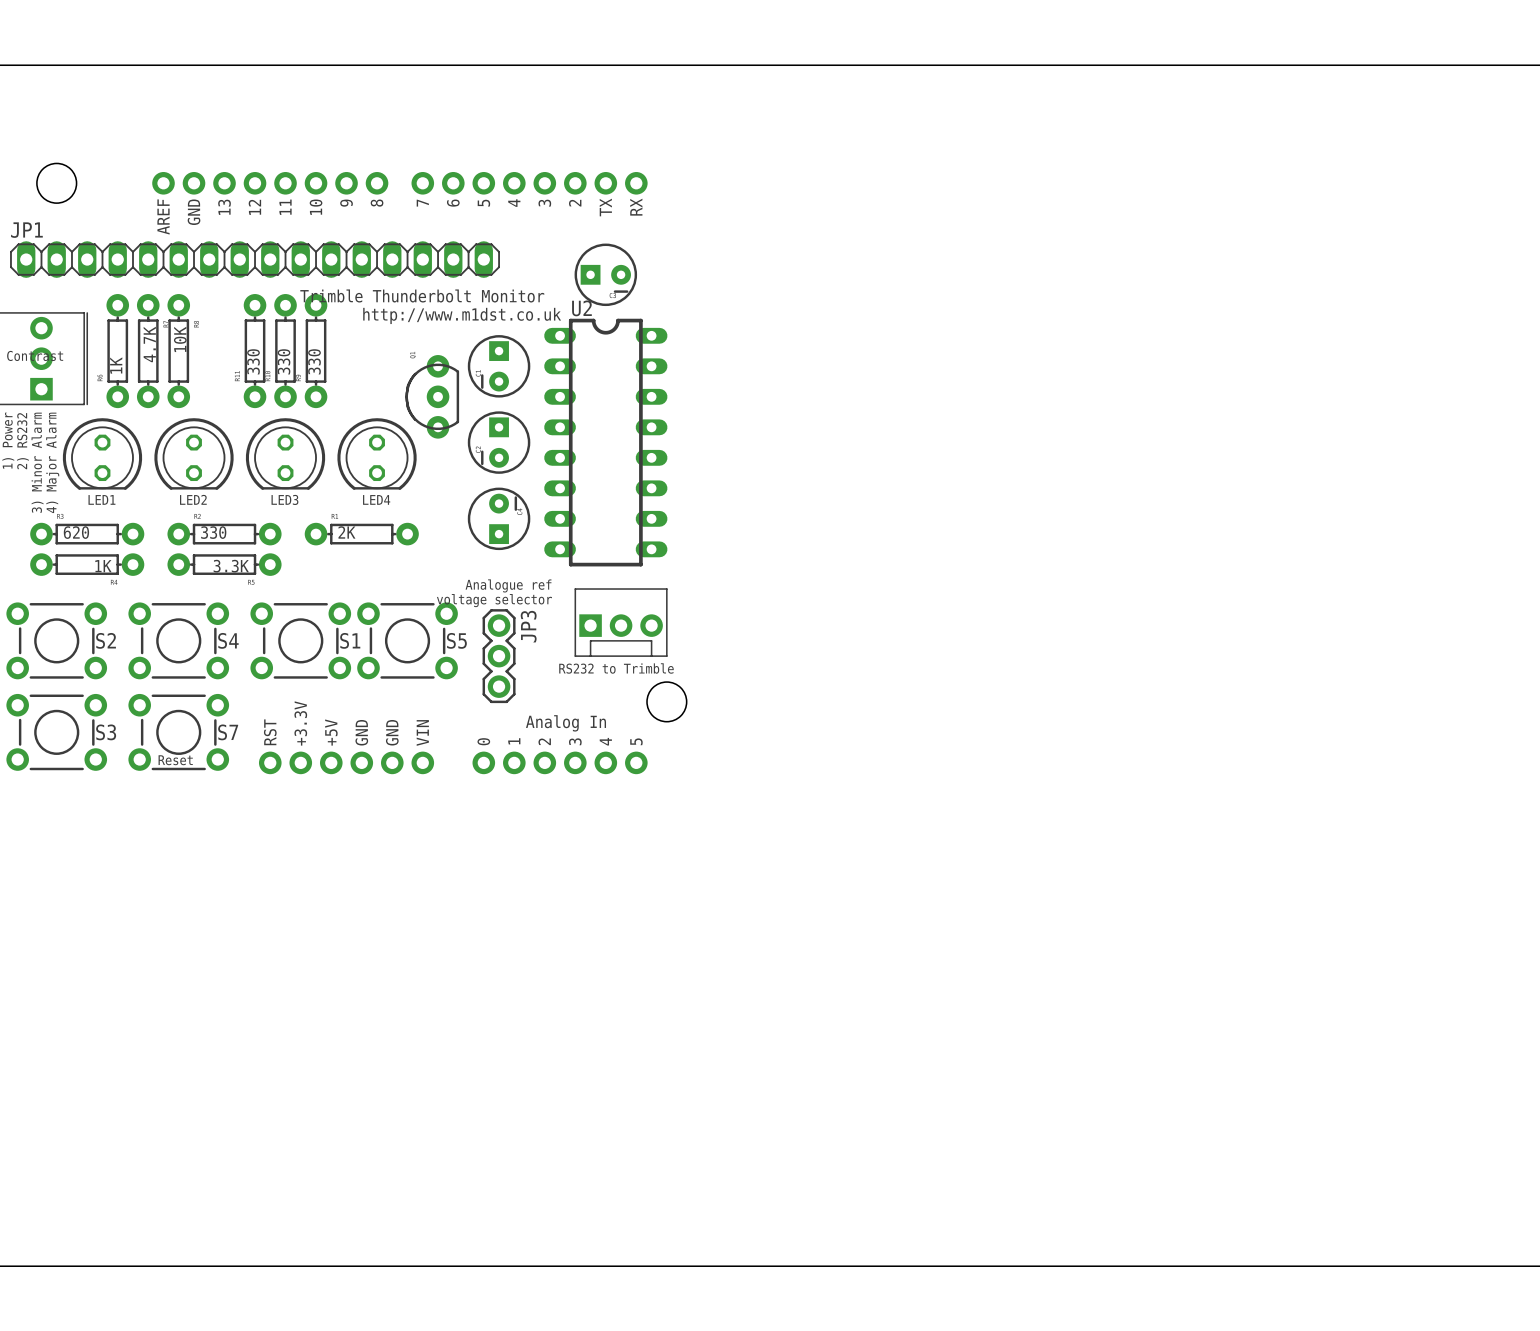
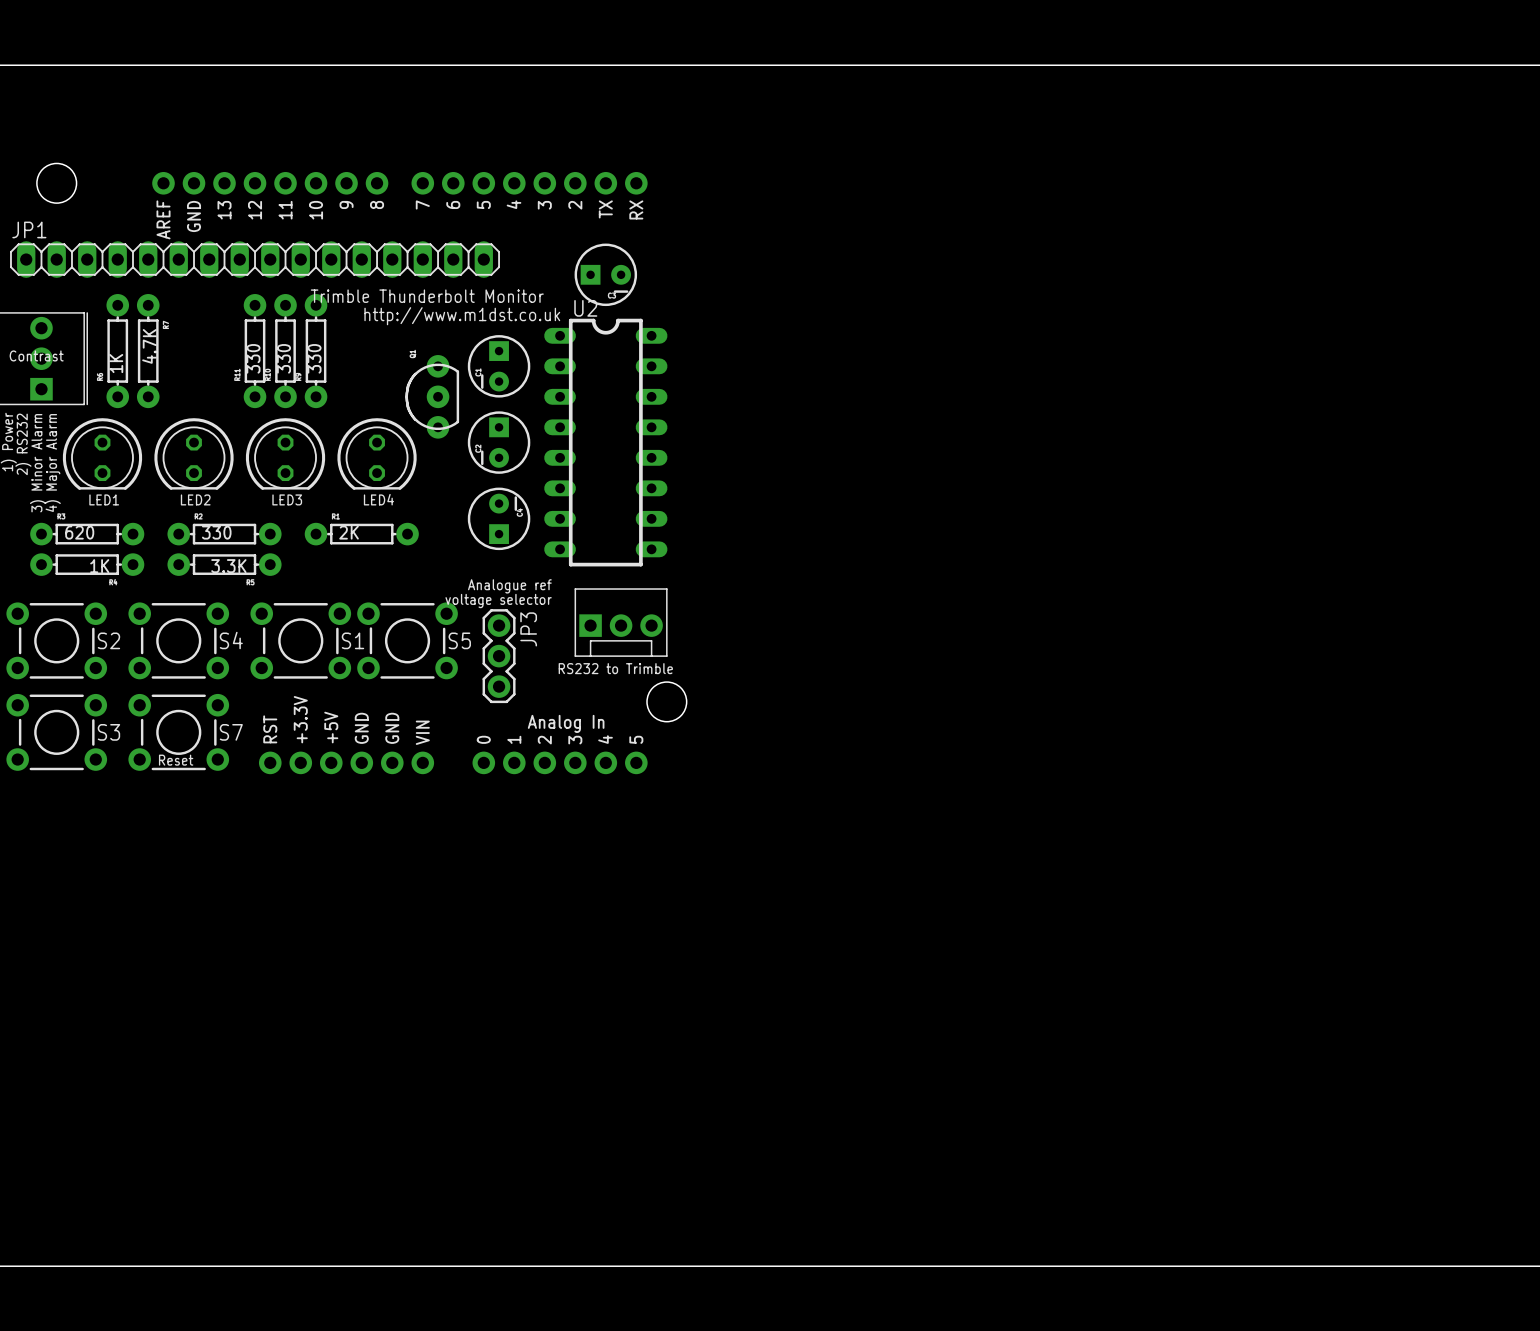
part: 10K (178, 351) -> none

